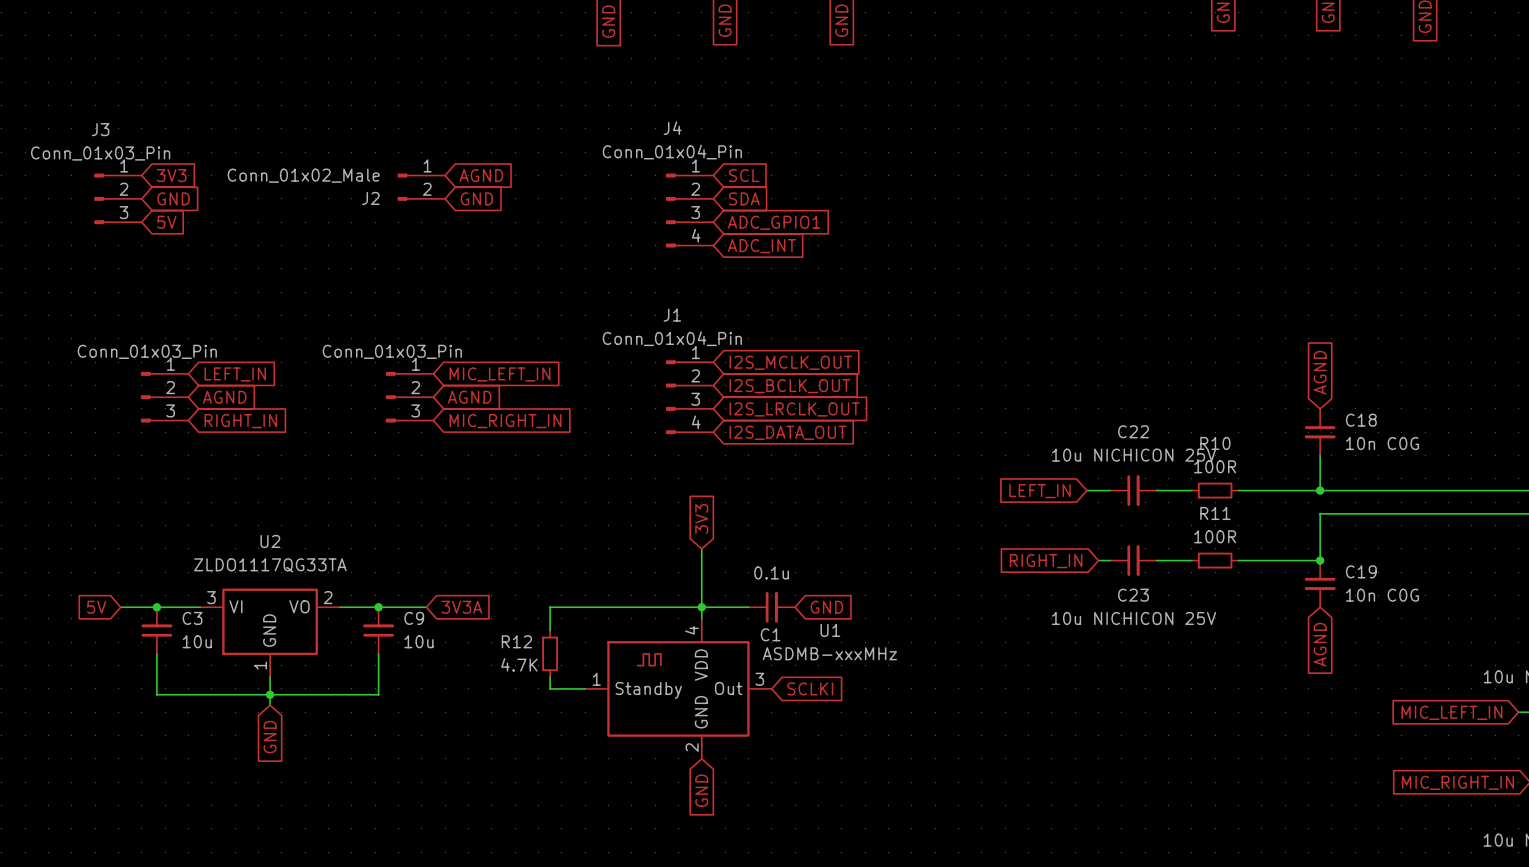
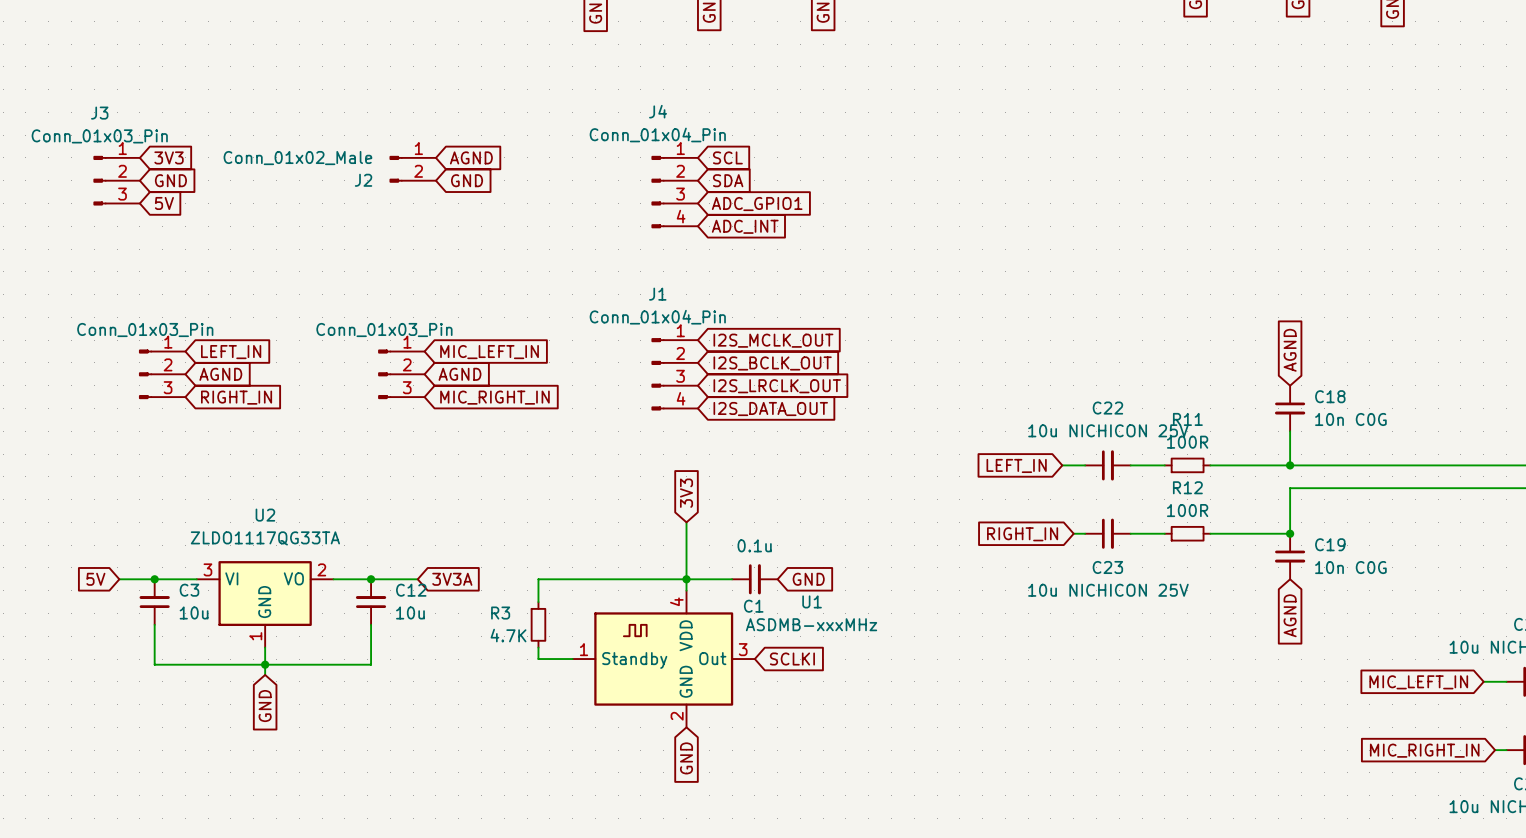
R10 name: R10 (1215, 443) -> R11 (1187, 419)
R11 name: R11 (1215, 513) -> R12 (1187, 487)
C9 name: C9 (414, 618) -> C12 (411, 590)
R12 name: R12 (516, 641) -> R3 (500, 613)

